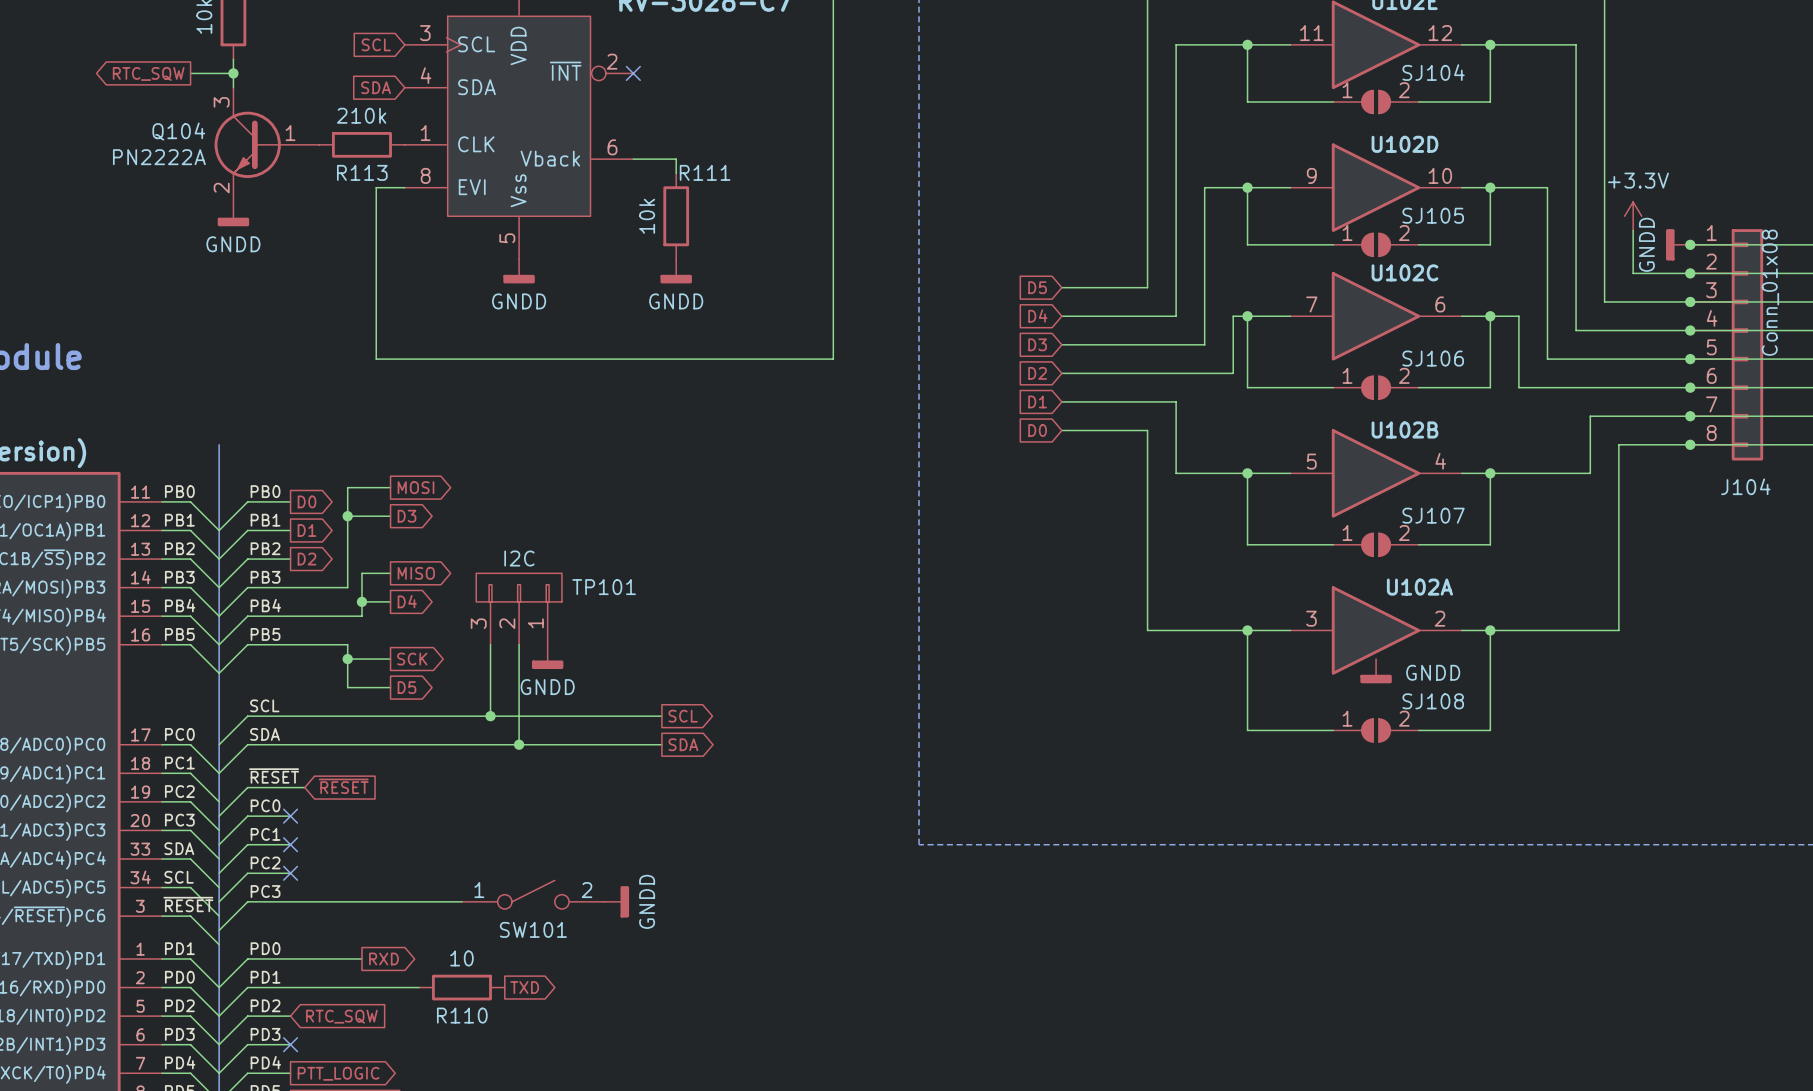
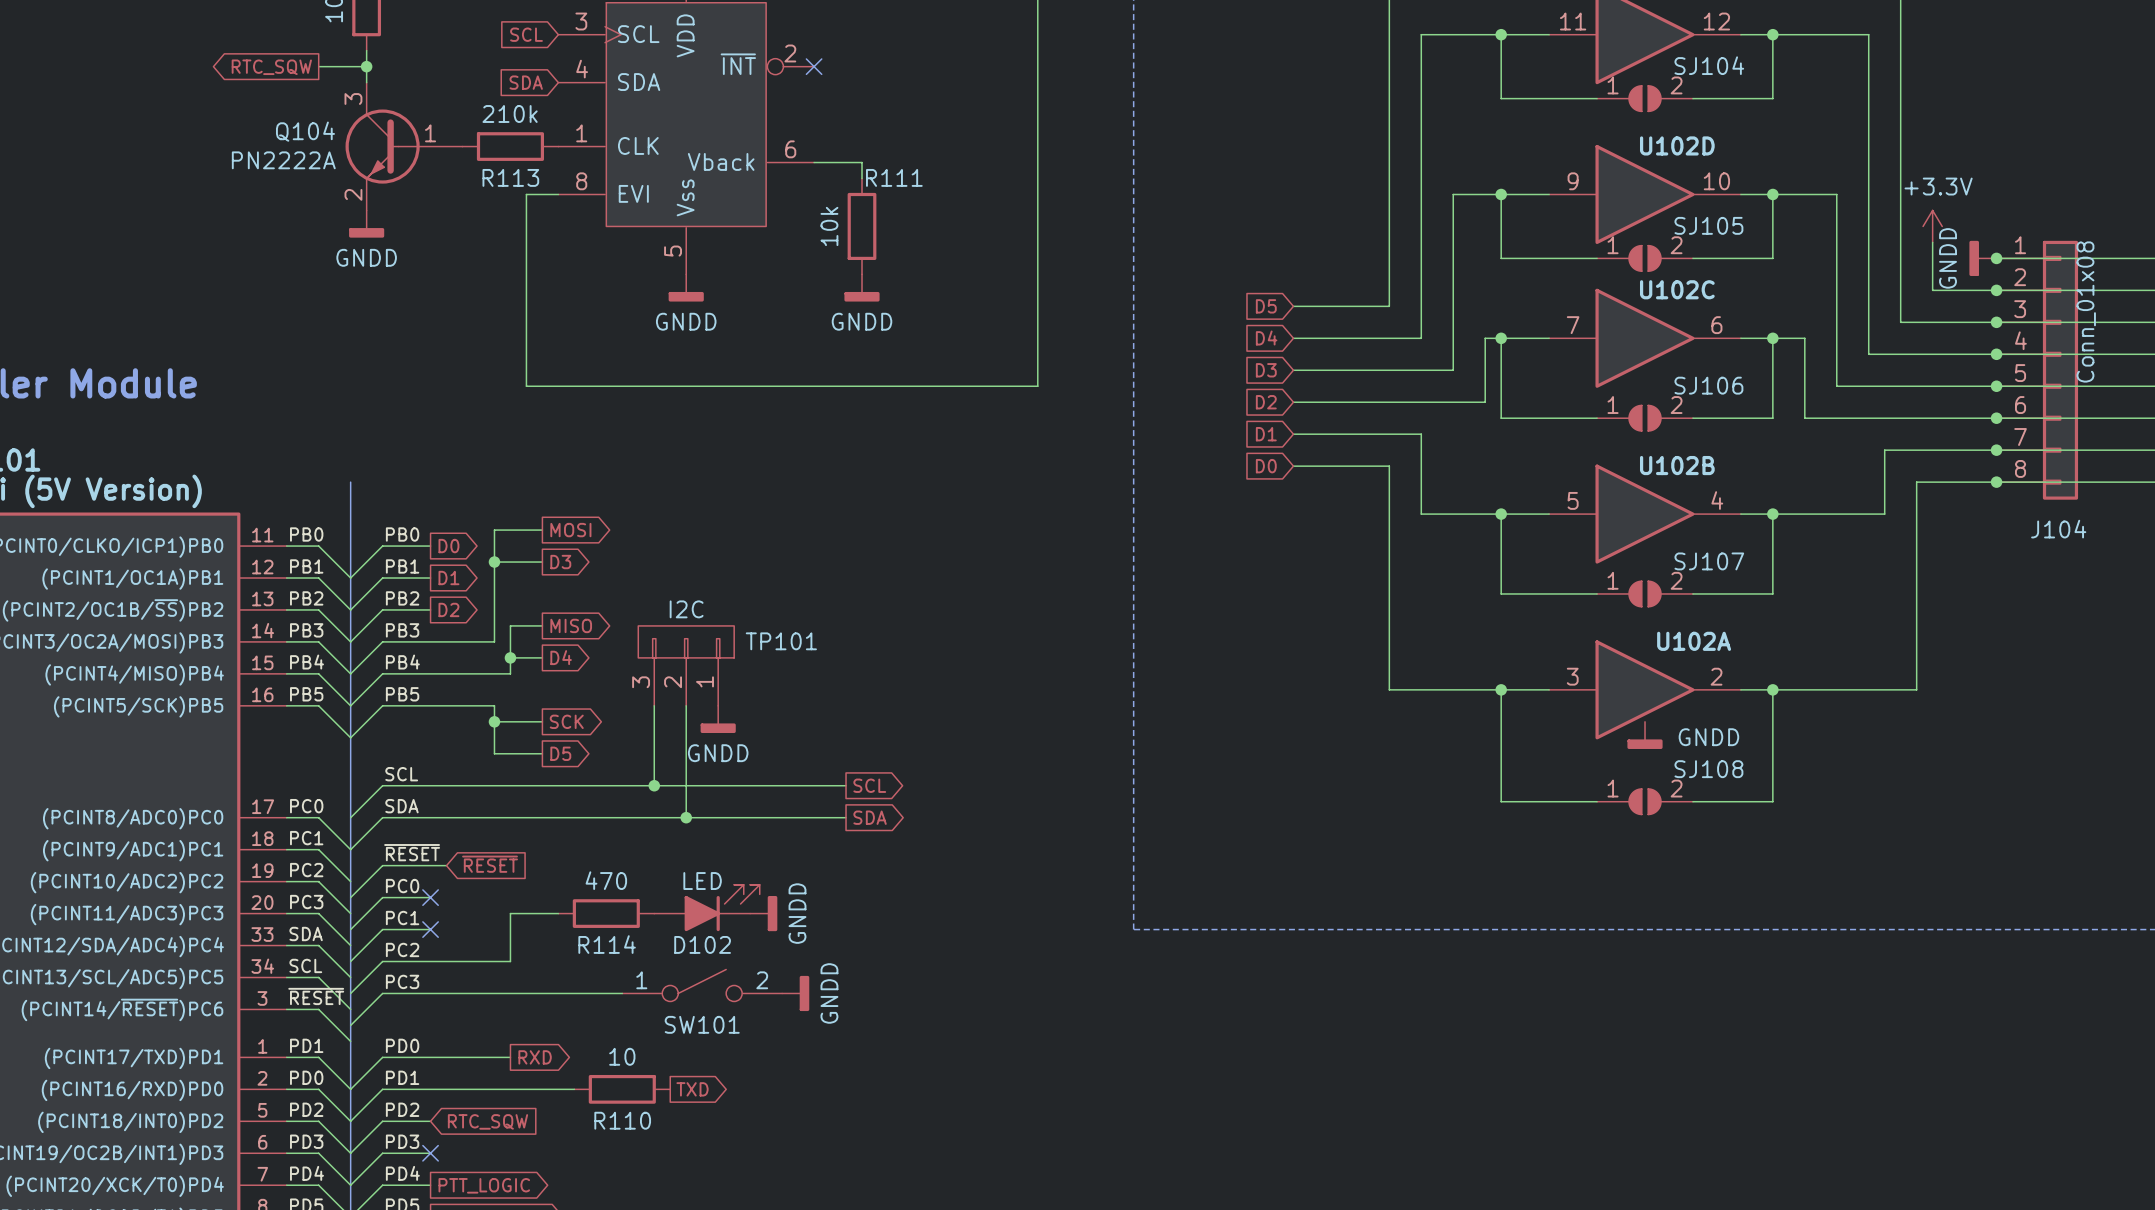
D102: none -> LED (707, 907)
wire: none -> (558, 913) (510, 913) (510, 961) (430, 961)
R114: none -> 470 (606, 913)
power symbol: none -> GNDD (763, 913)
no-connect mark: (290, 873) -> none

